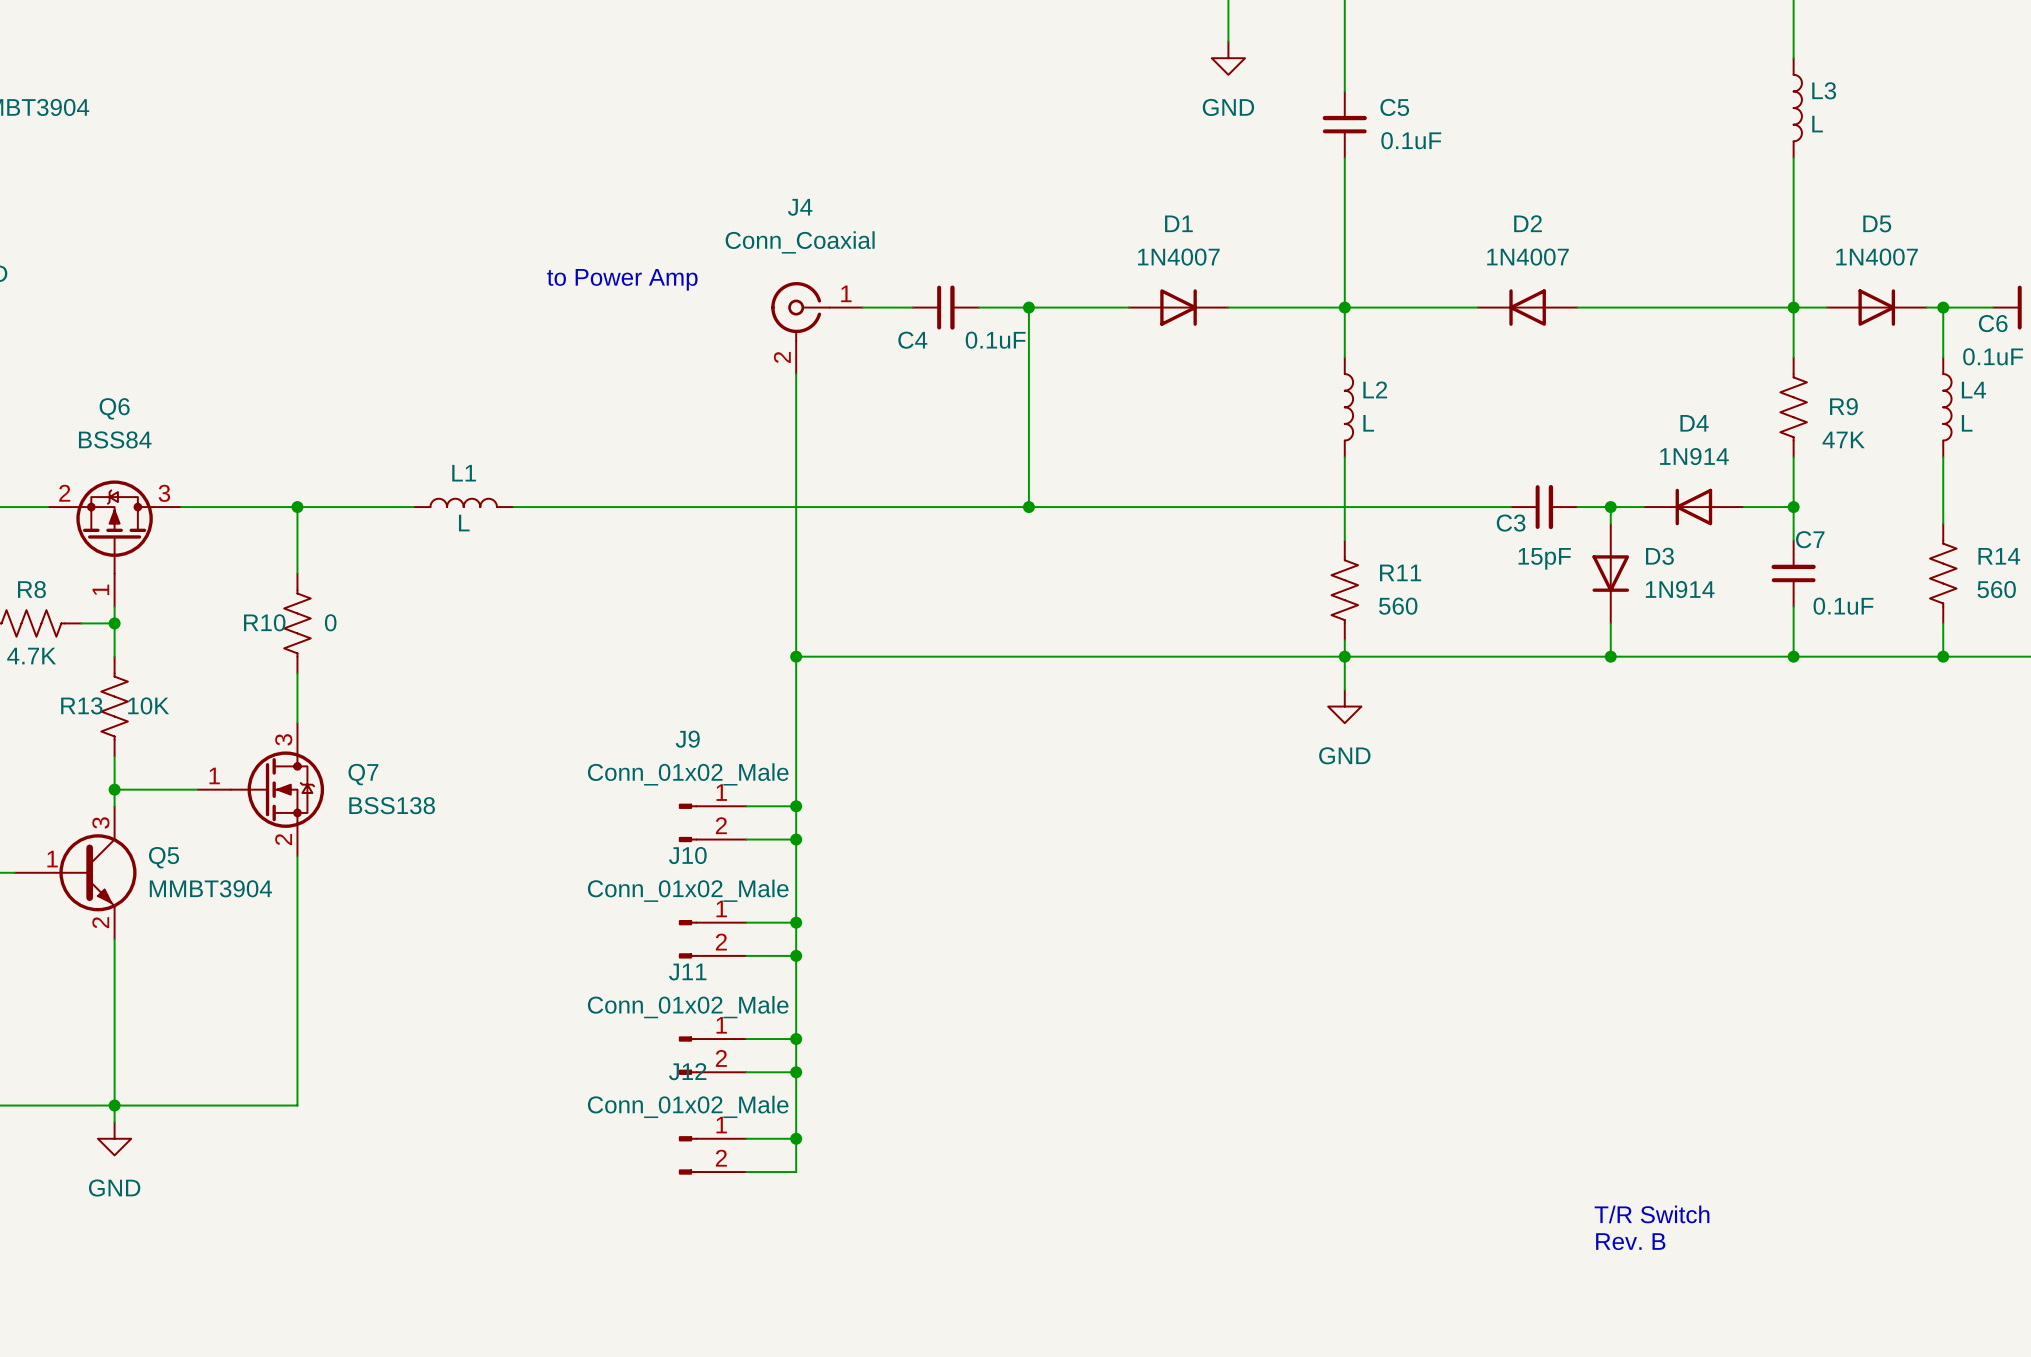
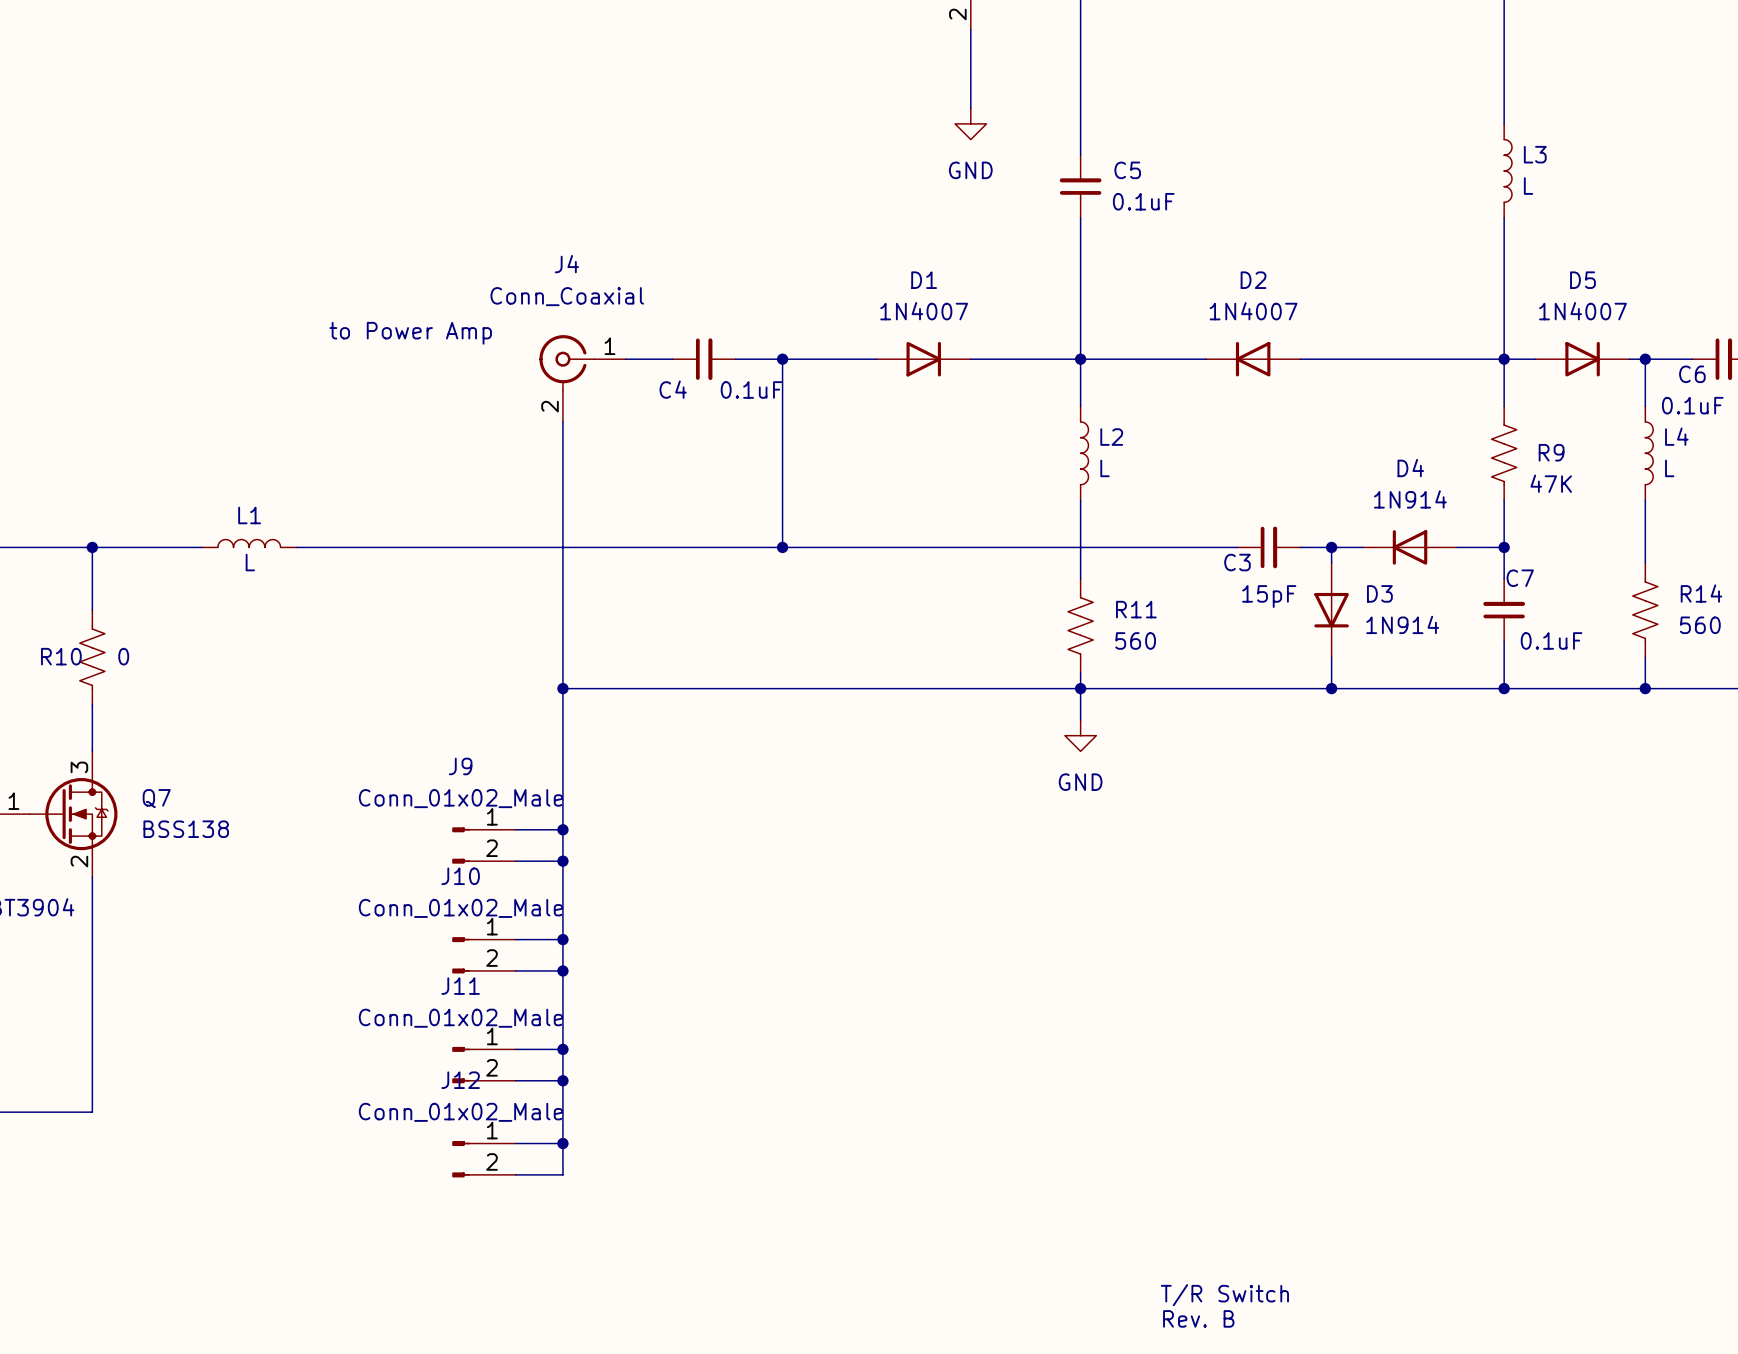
text position: T/R Switch (1652, 1214) -> T/R Switch (1224, 1295)
text position: Rev. B (1630, 1241) -> Rev. B (1198, 1318)

